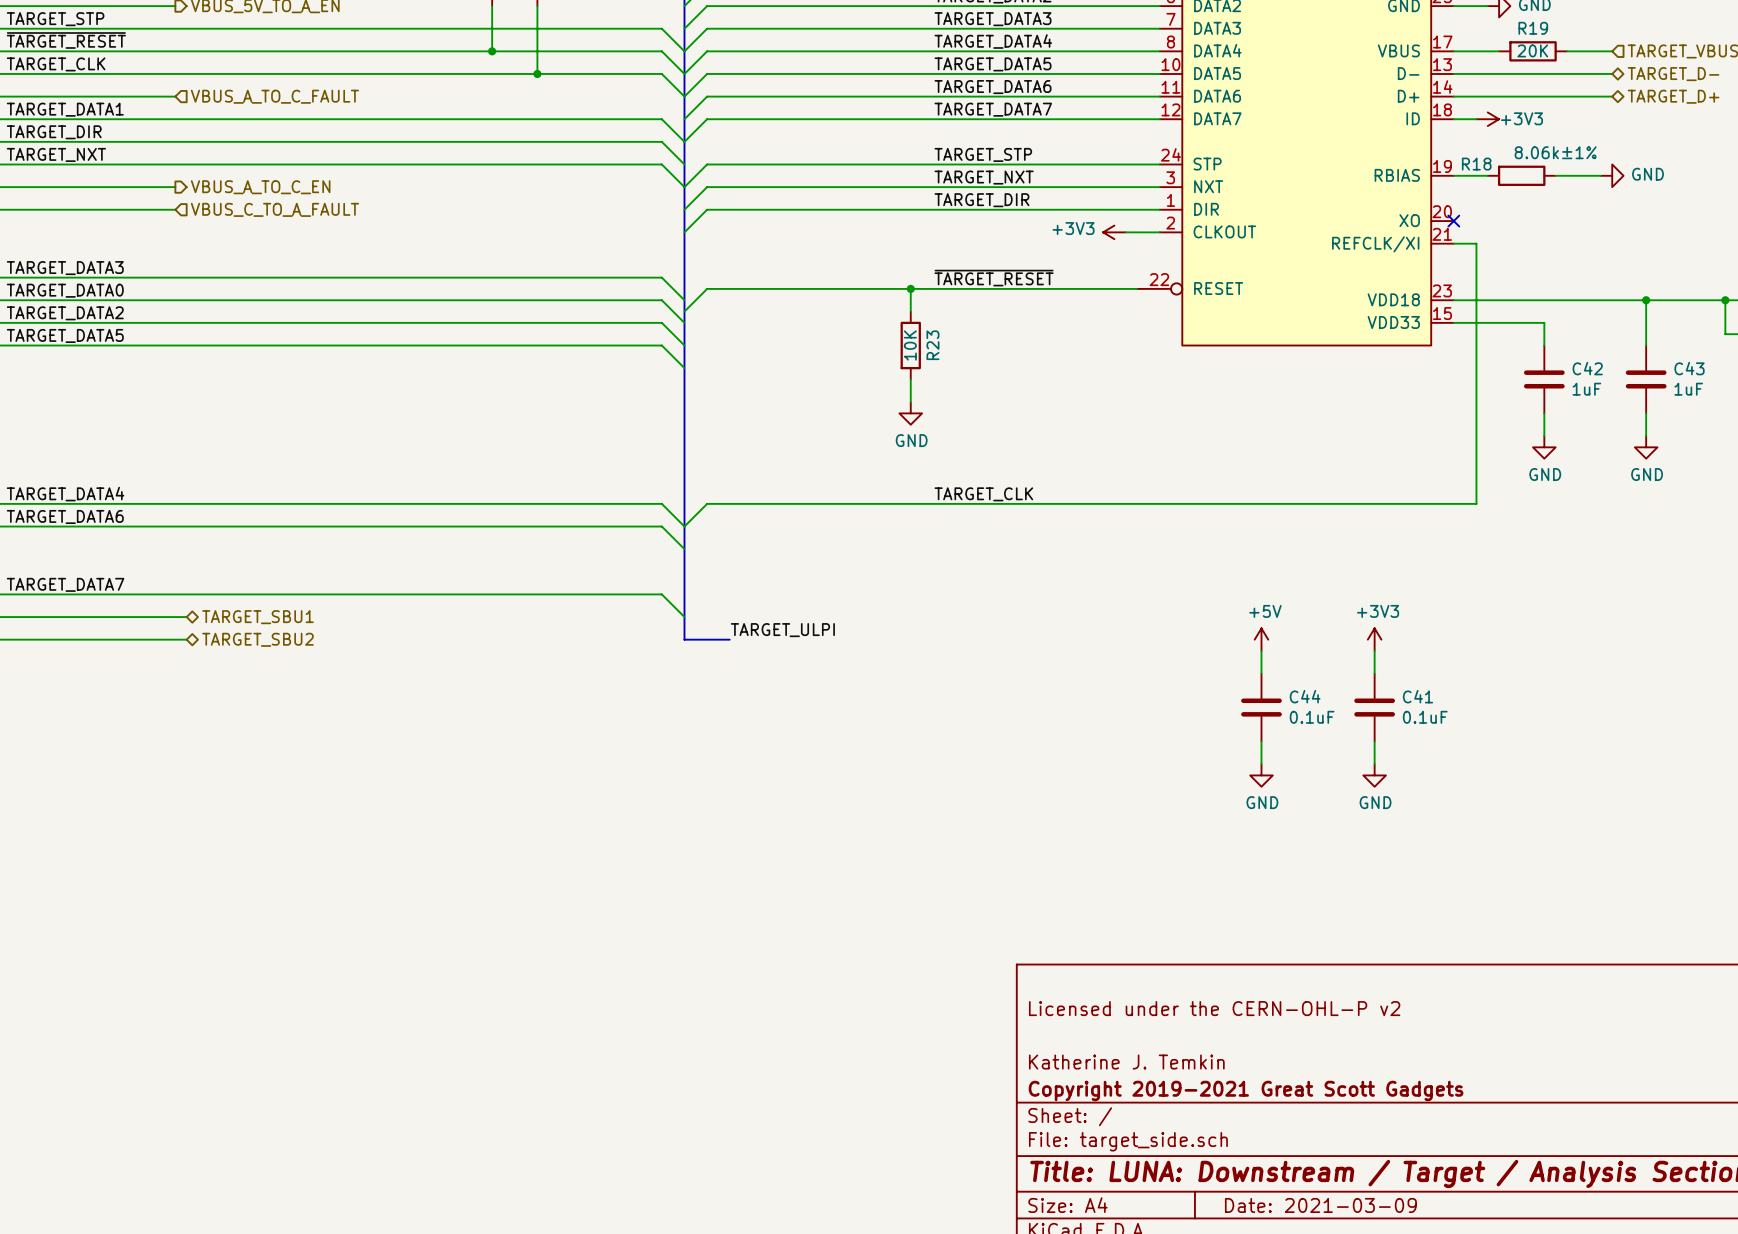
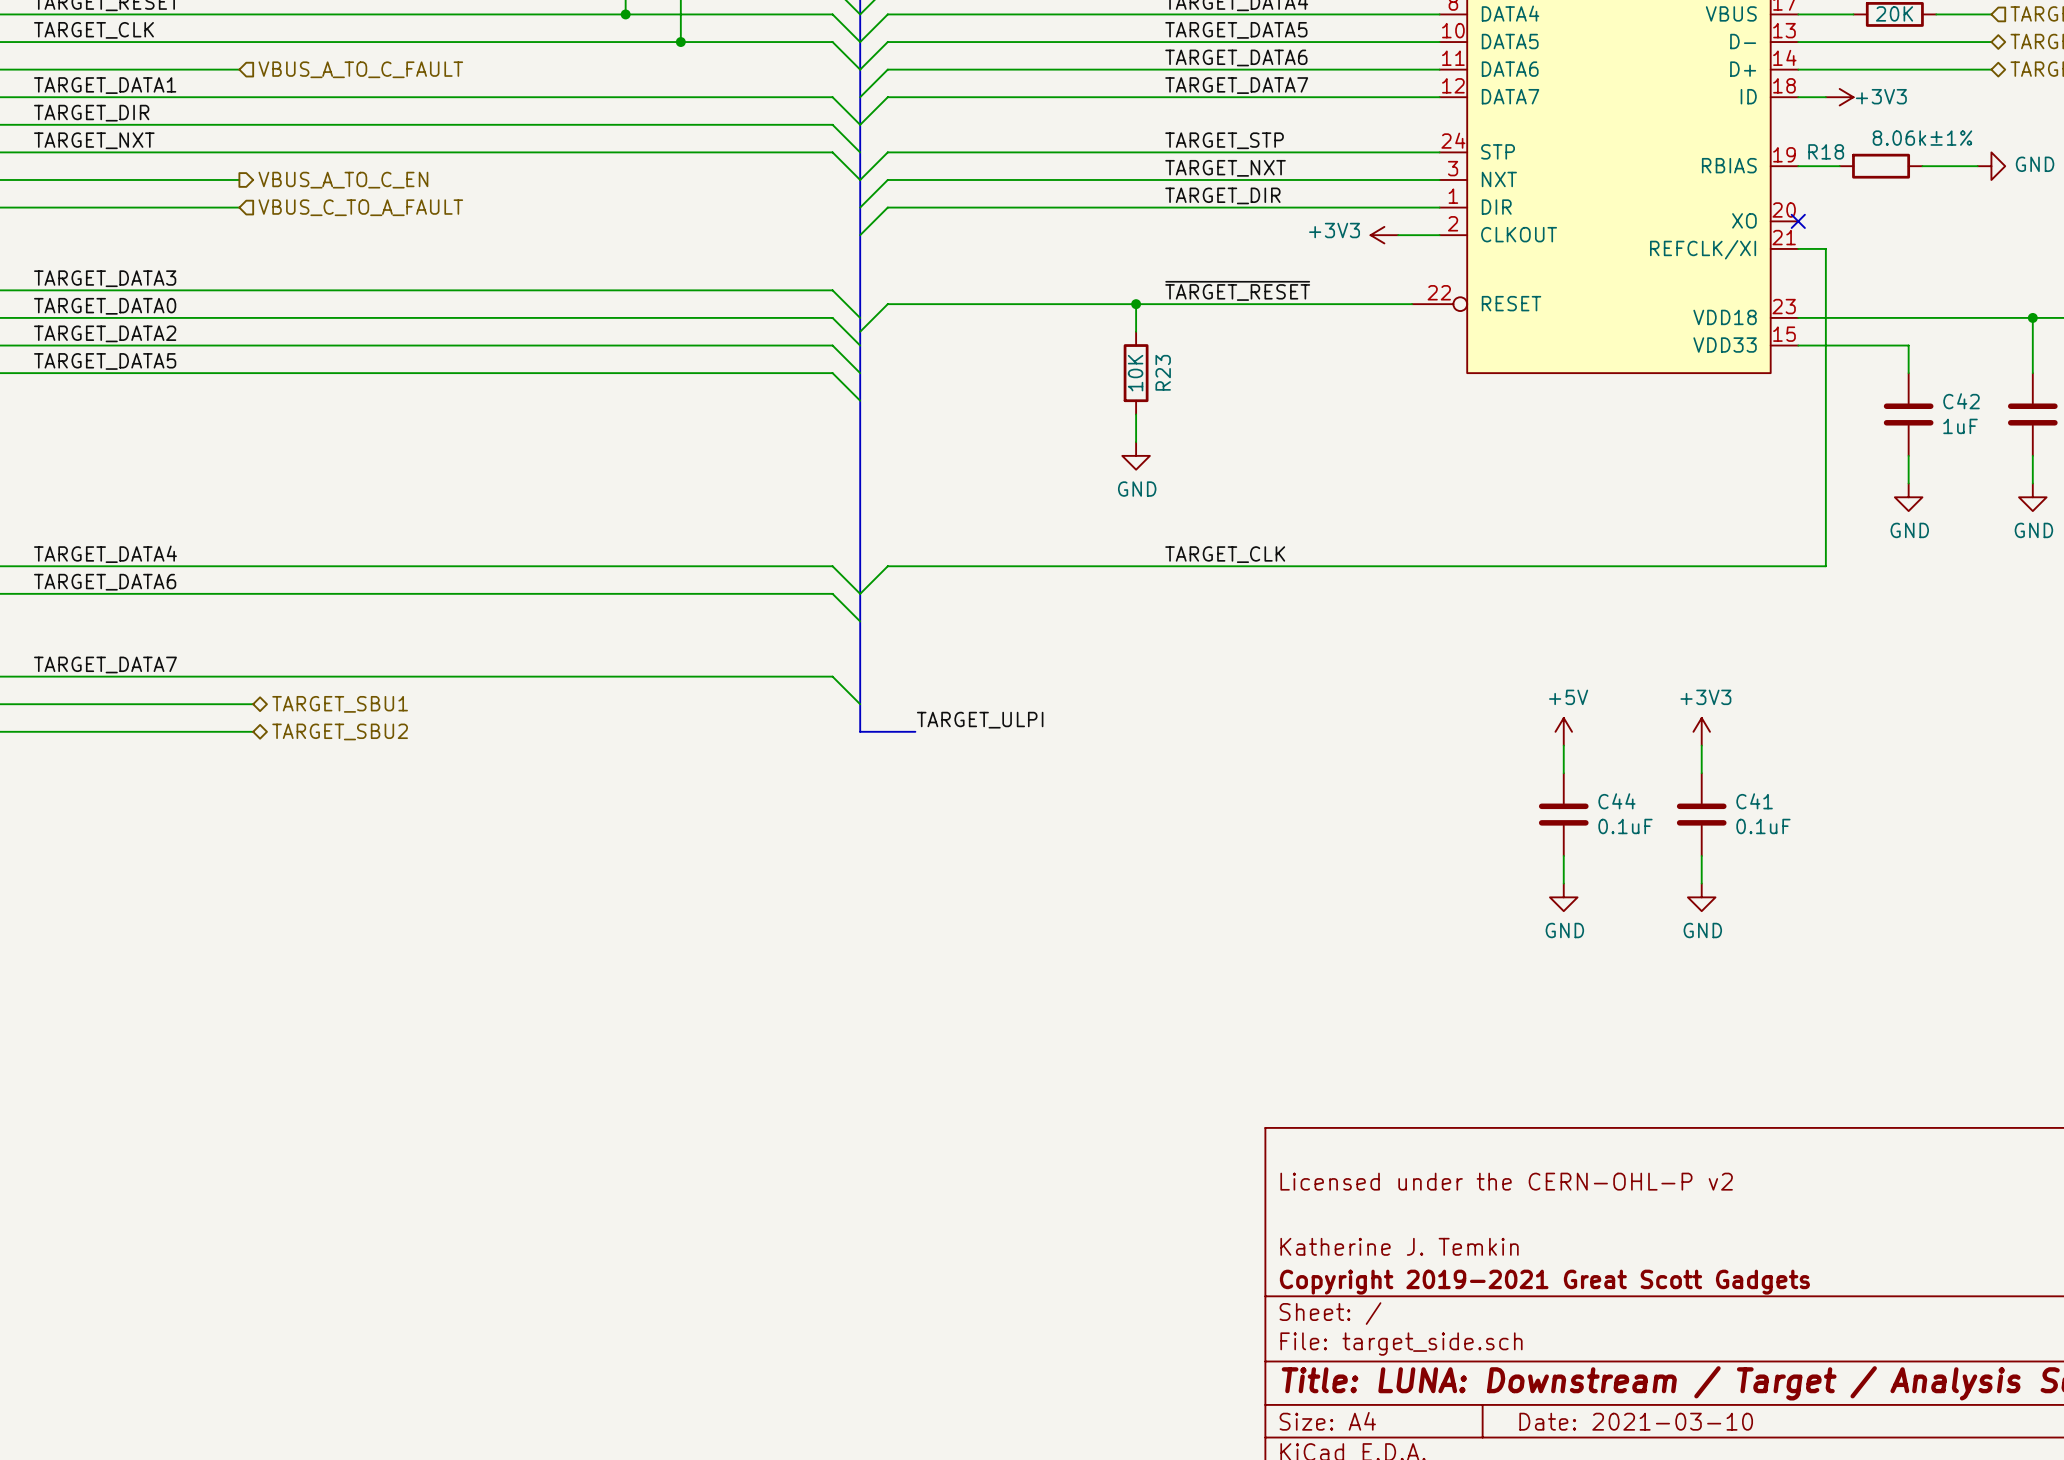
title block: Date: 2021-03-09 (1320, 1205) -> Date: 2021-03-10 (1636, 1421)

